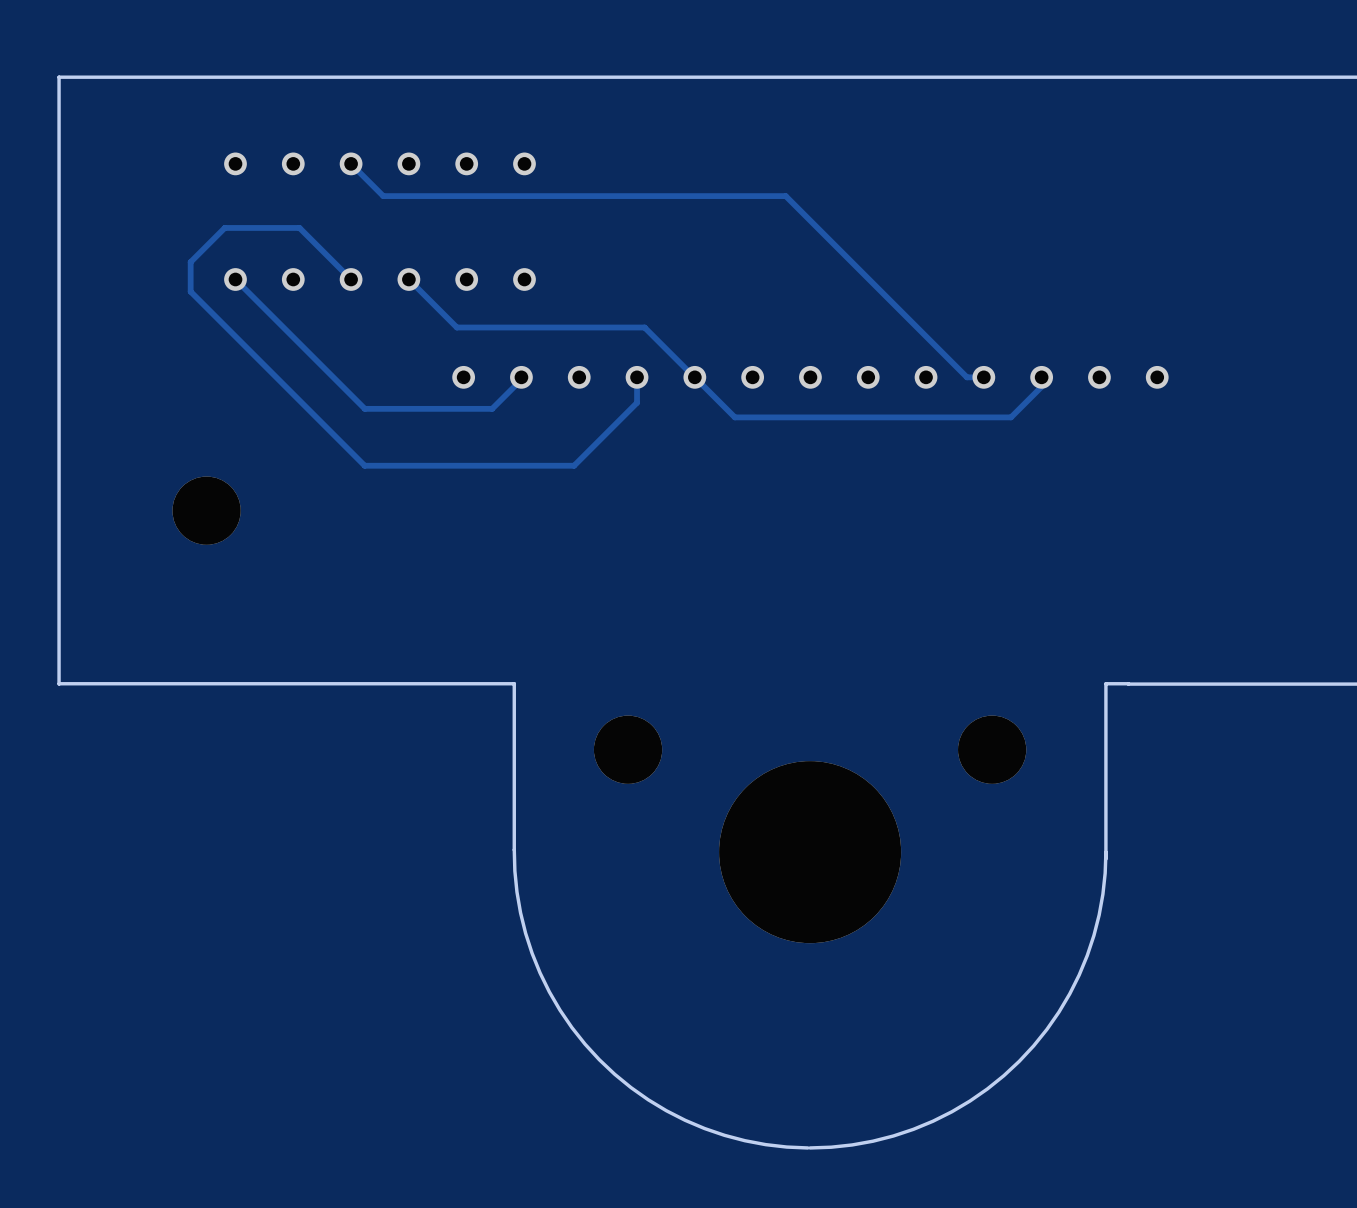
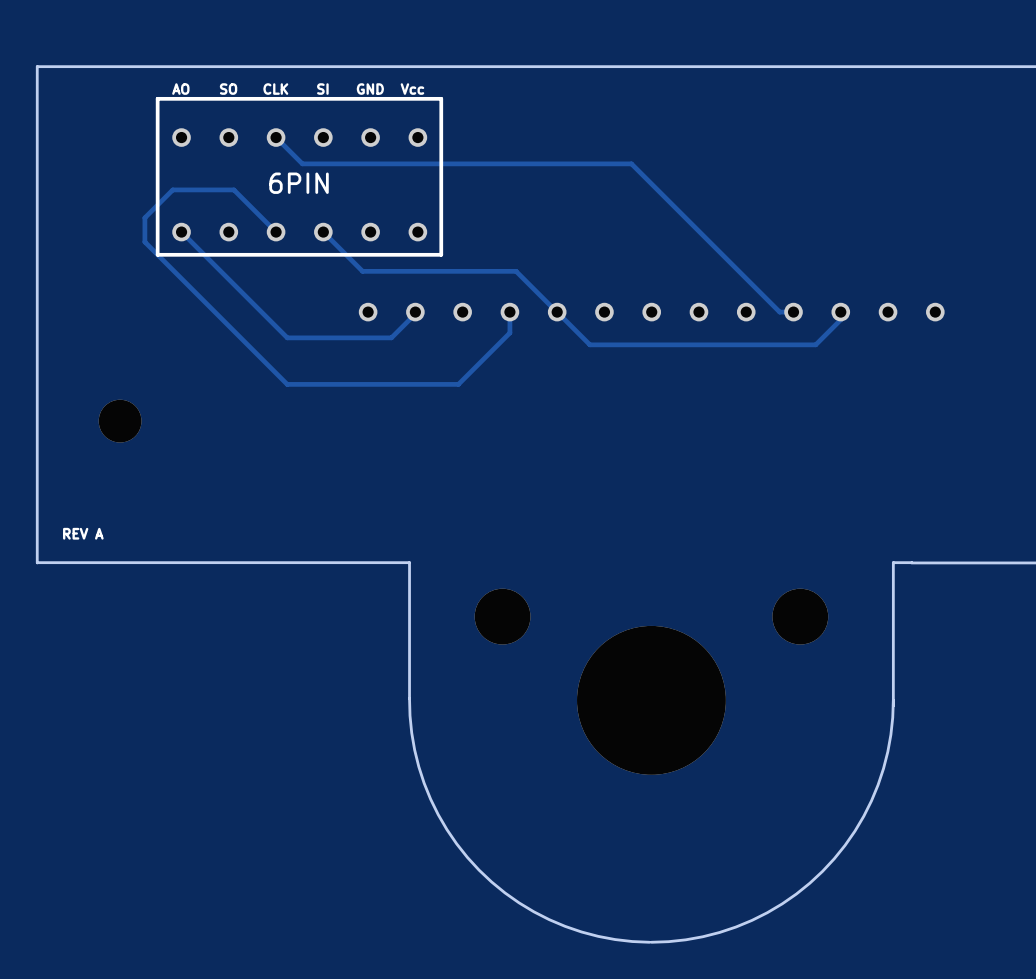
text: none -> AO (180, 89)
text: none -> SO (228, 89)
text: none -> CLK (275, 89)
text: none -> SI (322, 89)
text: none -> GND (370, 89)
text: none -> Vcc (412, 89)
line: none -> (441, 98) (157, 98) (157, 254) (441, 254) (441, 98)
text: none -> 6PIN (299, 183)
part: none -> (120, 421)
part: (206, 510) -> none
text: none -> REV A (83, 533)

